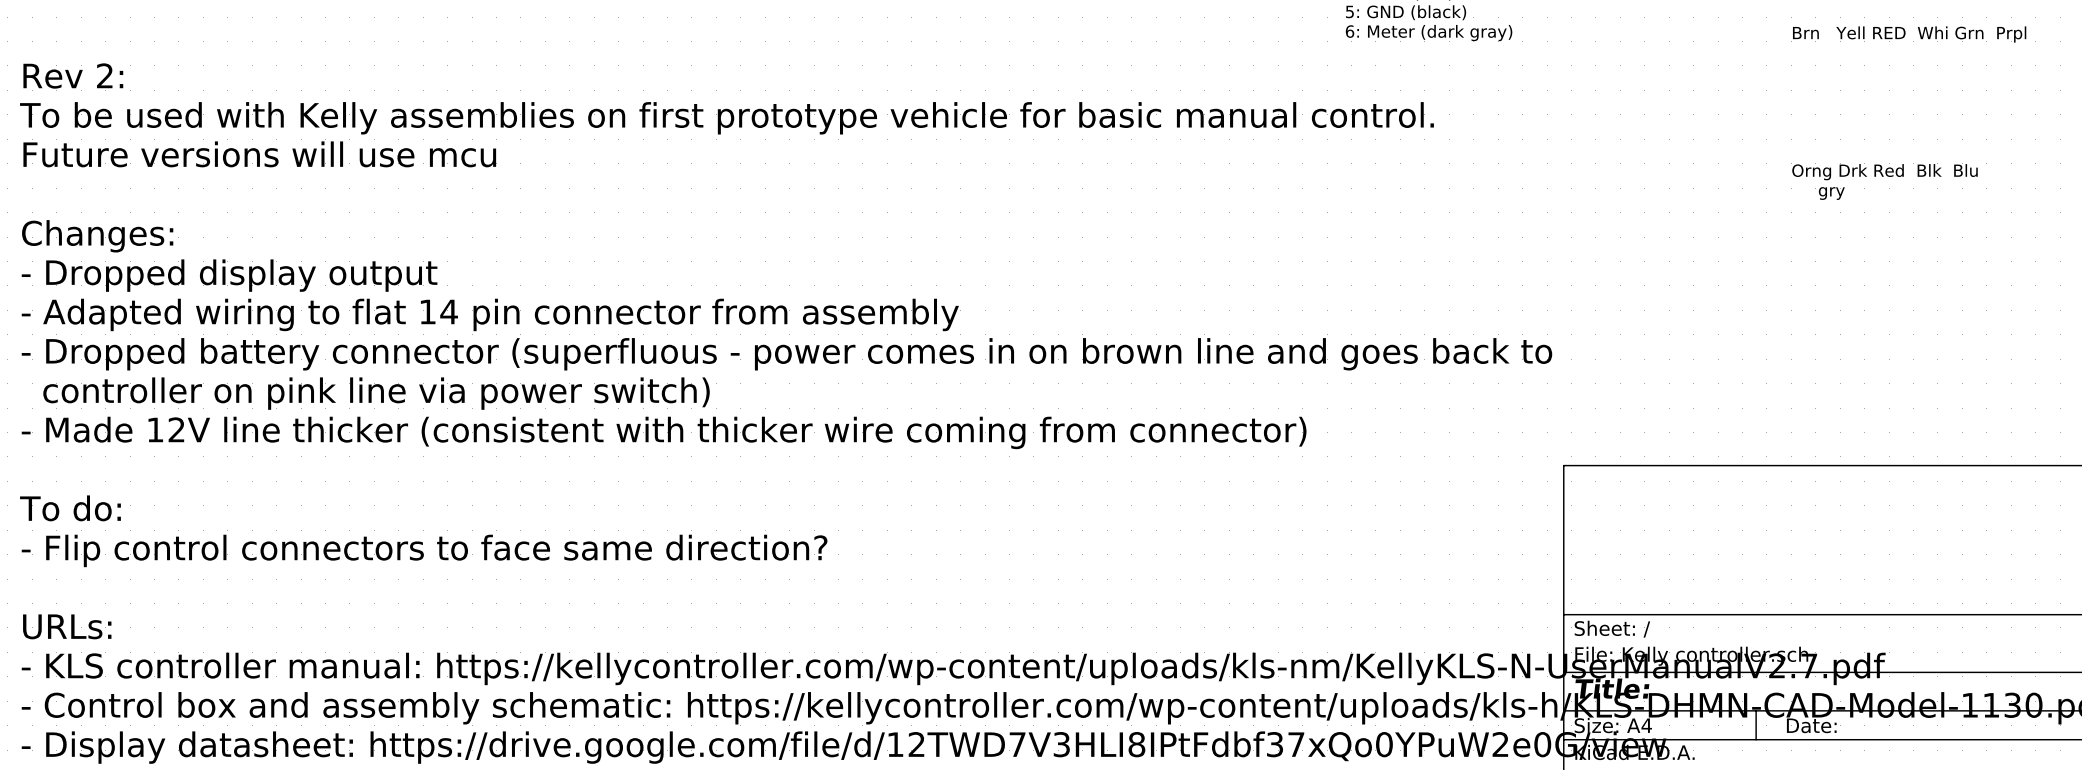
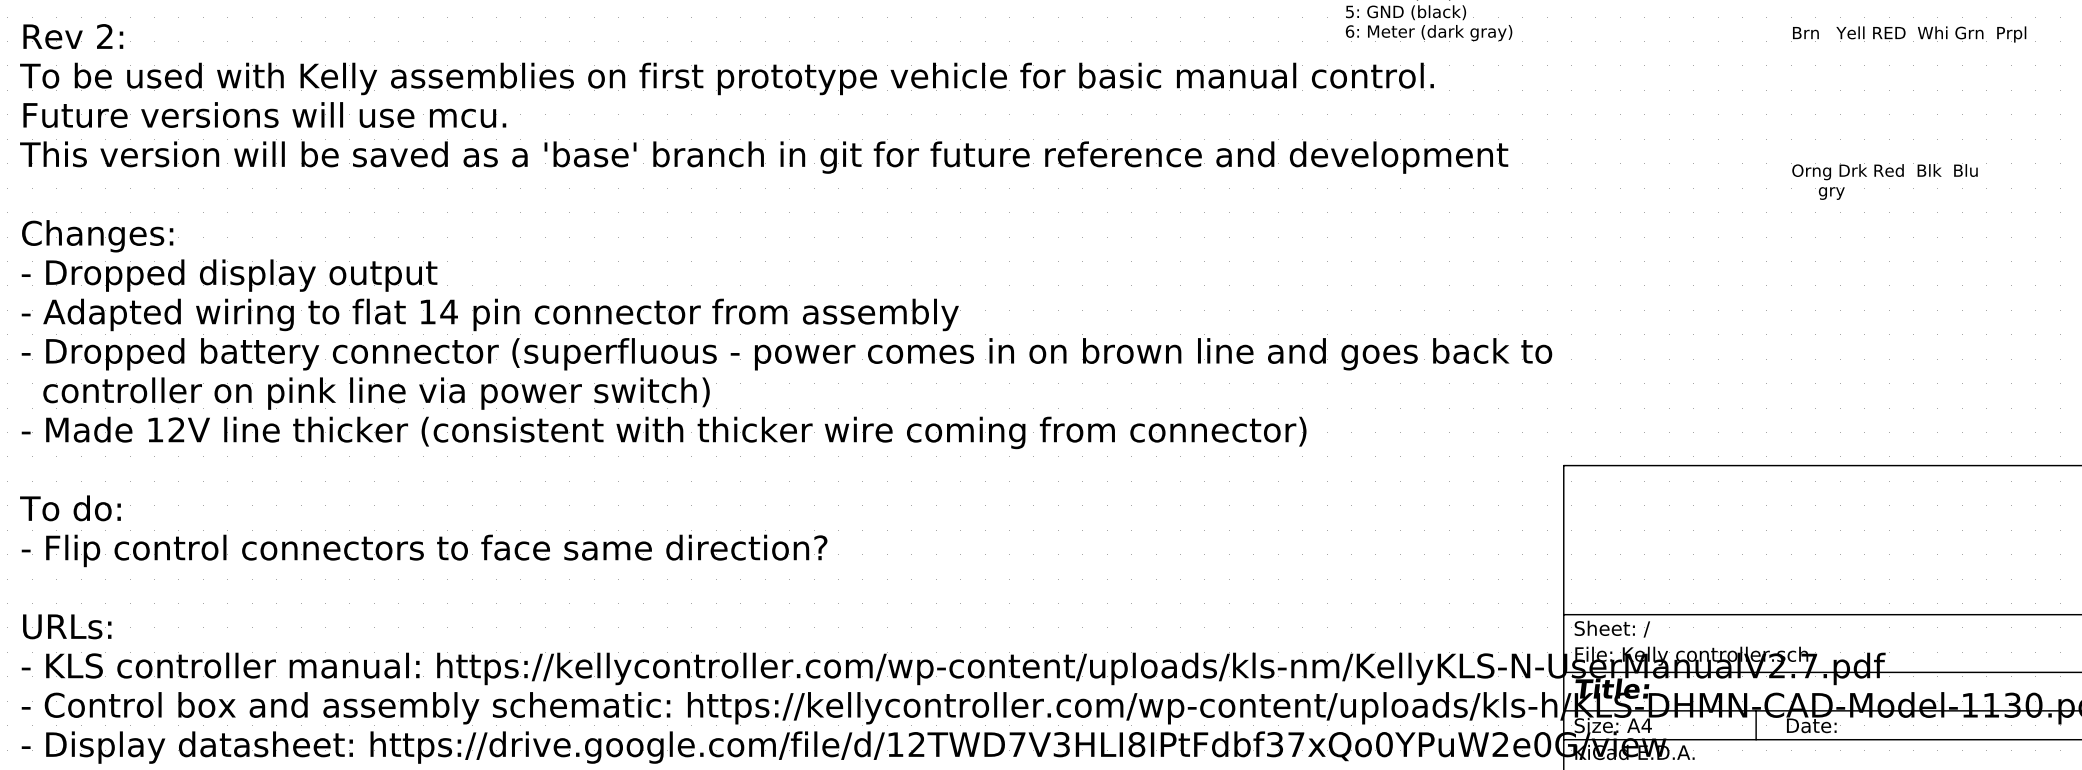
text: none -> Rev 2: (73, 36)
text: Rev 2: (73, 76) -> To be used with Kelly assemblies on first prototype vehicle for basic manual control. (726, 78)
text: To be used with Kelly assemblies on first prototype vehicle for basic manual control. (726, 118) -> Future versions will use mcu. (264, 115)
text: Future versions will use mcu (259, 154) -> This version will be saved as a 'base' branch in git for future reference and development (764, 157)

